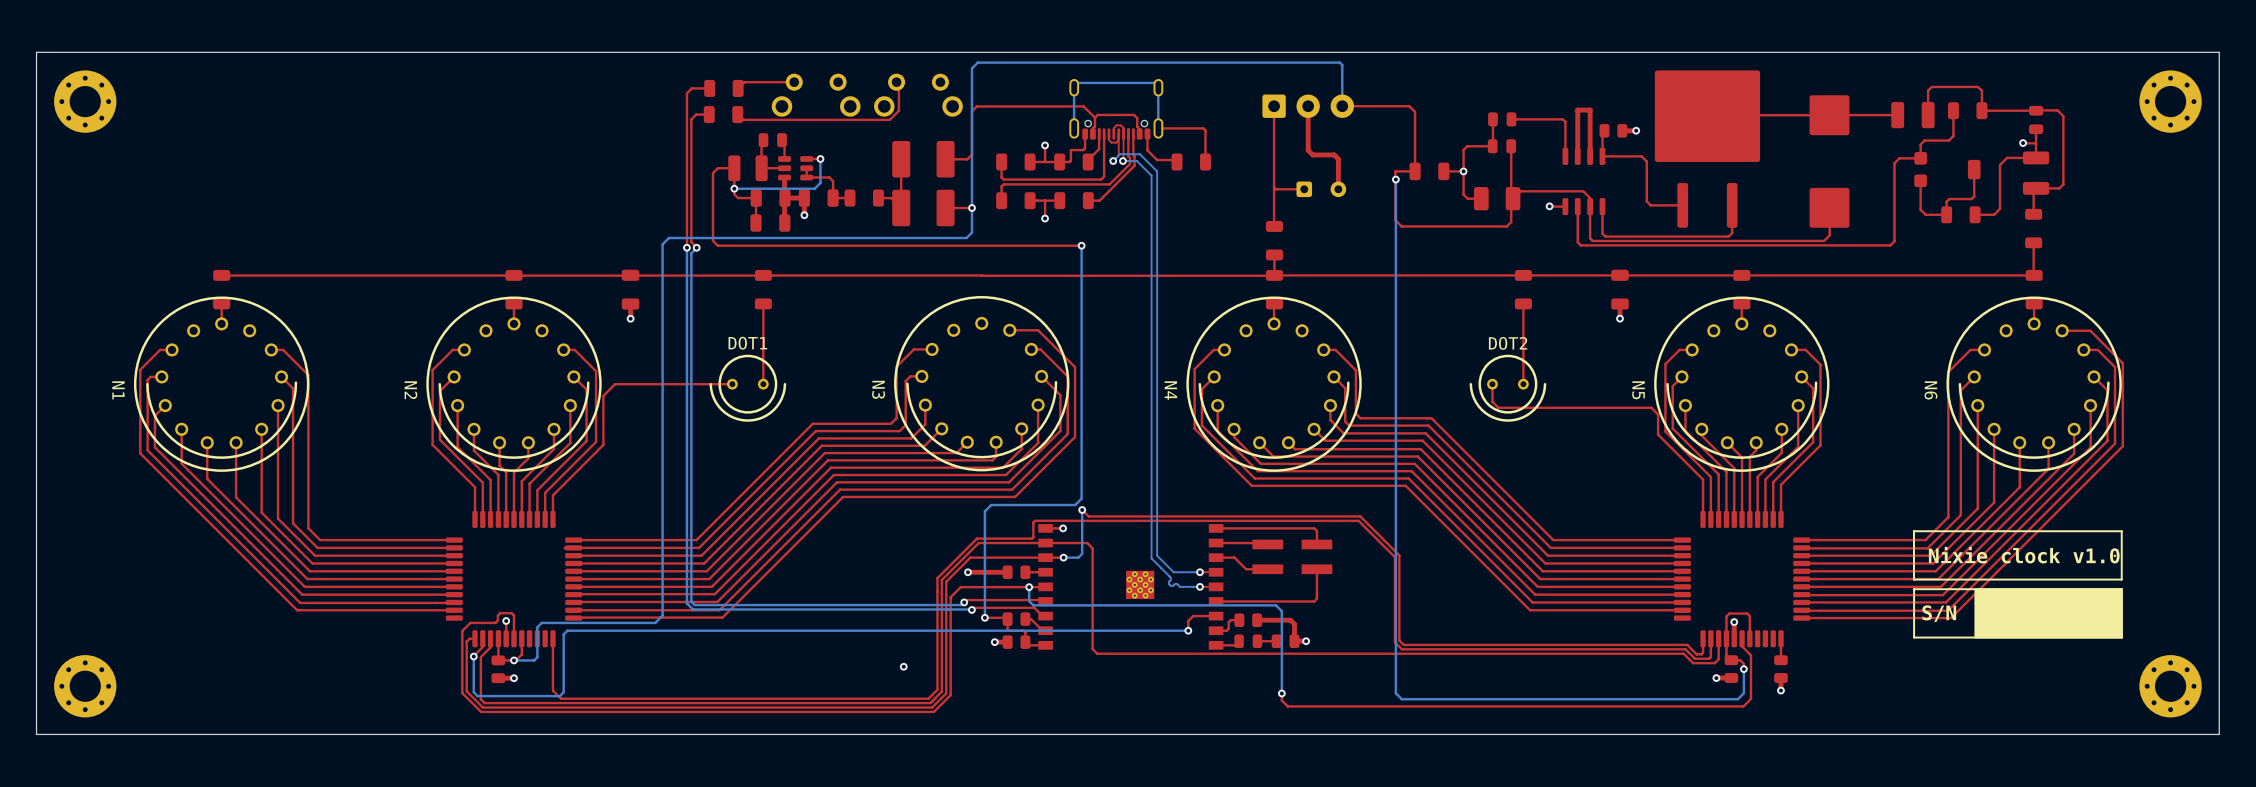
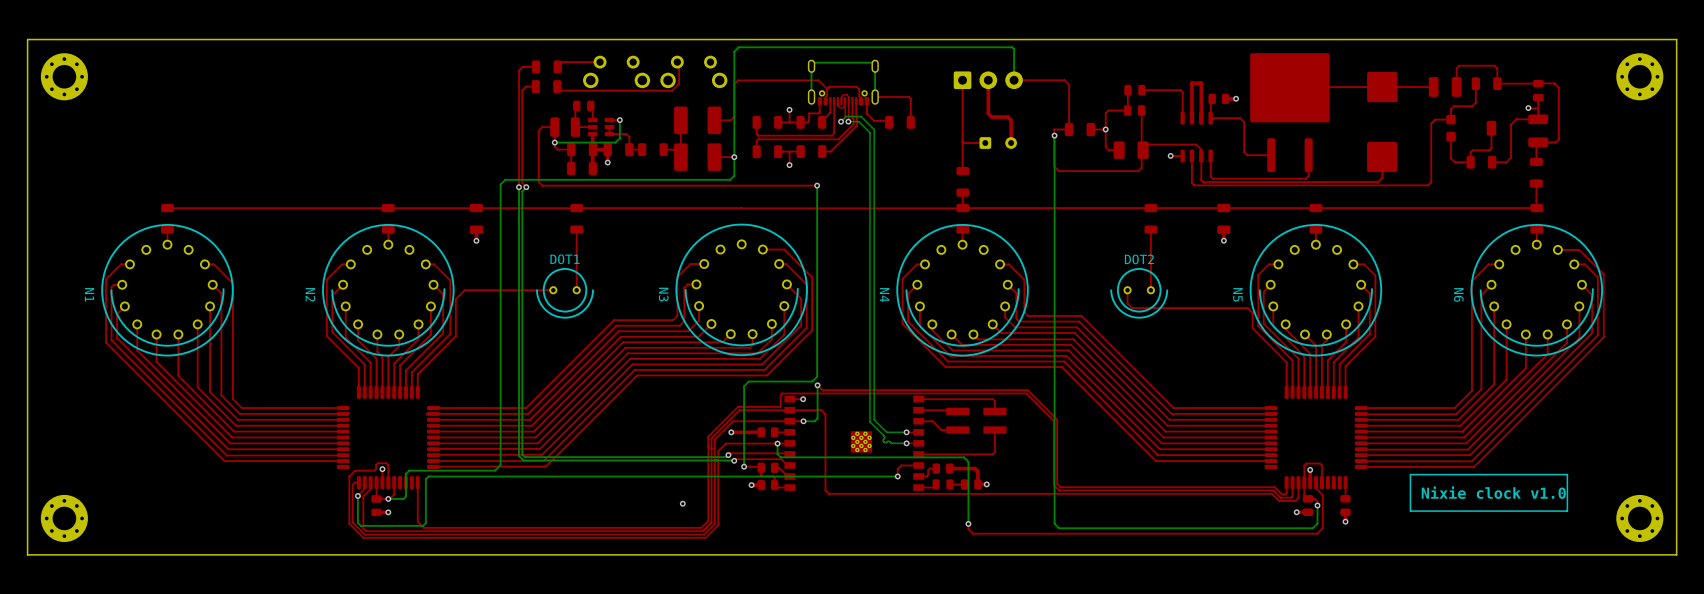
line: (2121, 531) (1913, 531) (1913, 579) (2121, 579) (2121, 531) -> none
text position: Nixie clock v1.0 (2024, 555) -> Nixie clock v1.0 (1493, 492)
drawing: [1974, 588, 2123, 639] -> none
line: (2121, 589) (1914, 589) (1914, 637) (2121, 637) (2121, 589) -> (1567, 474) (1410, 474) (1410, 511) (1567, 511) (1567, 474)
text: S/N (1939, 613) -> none

